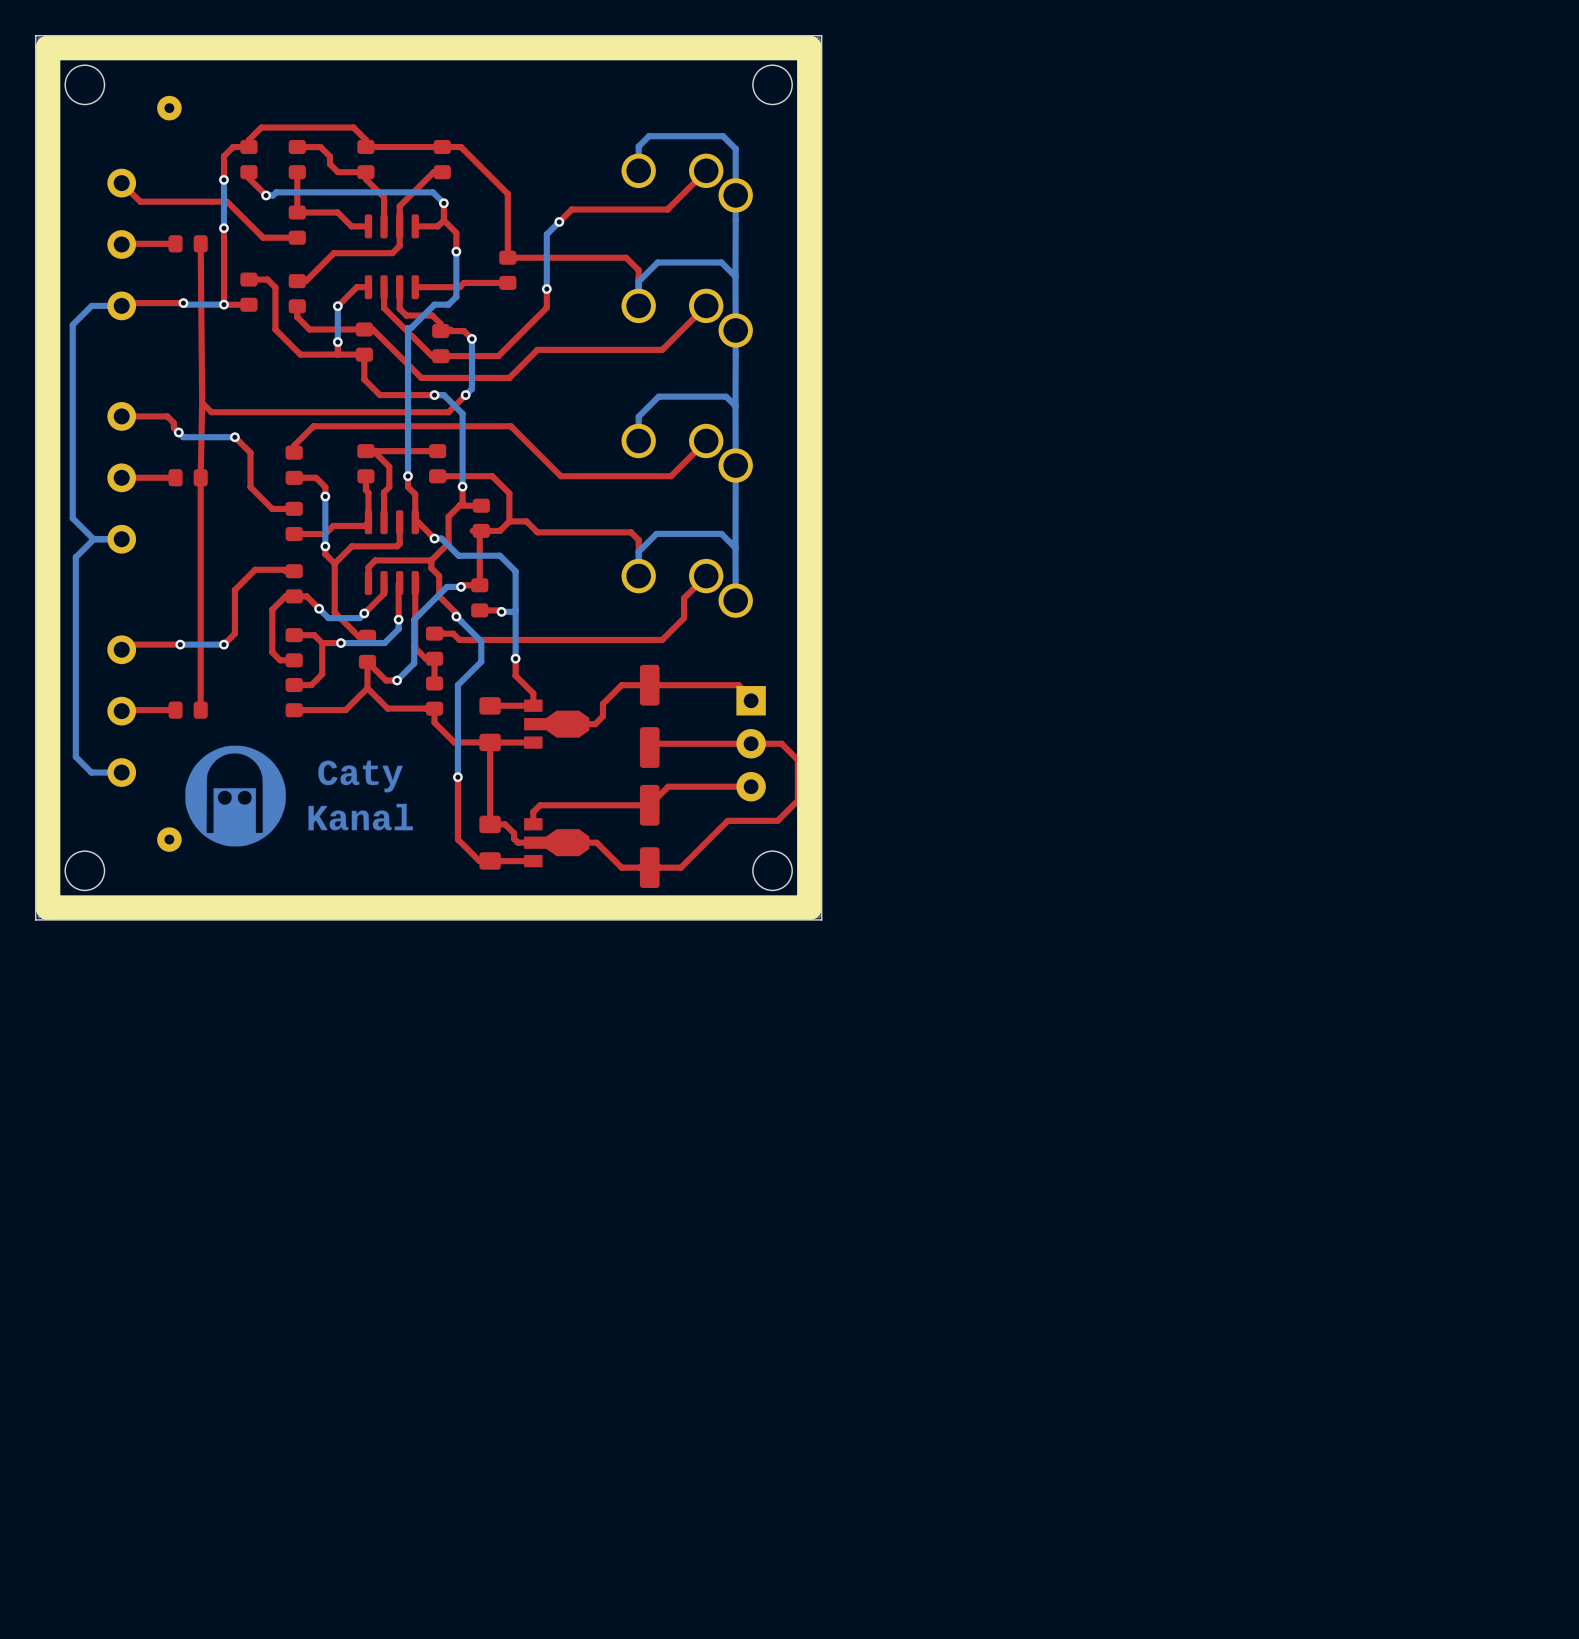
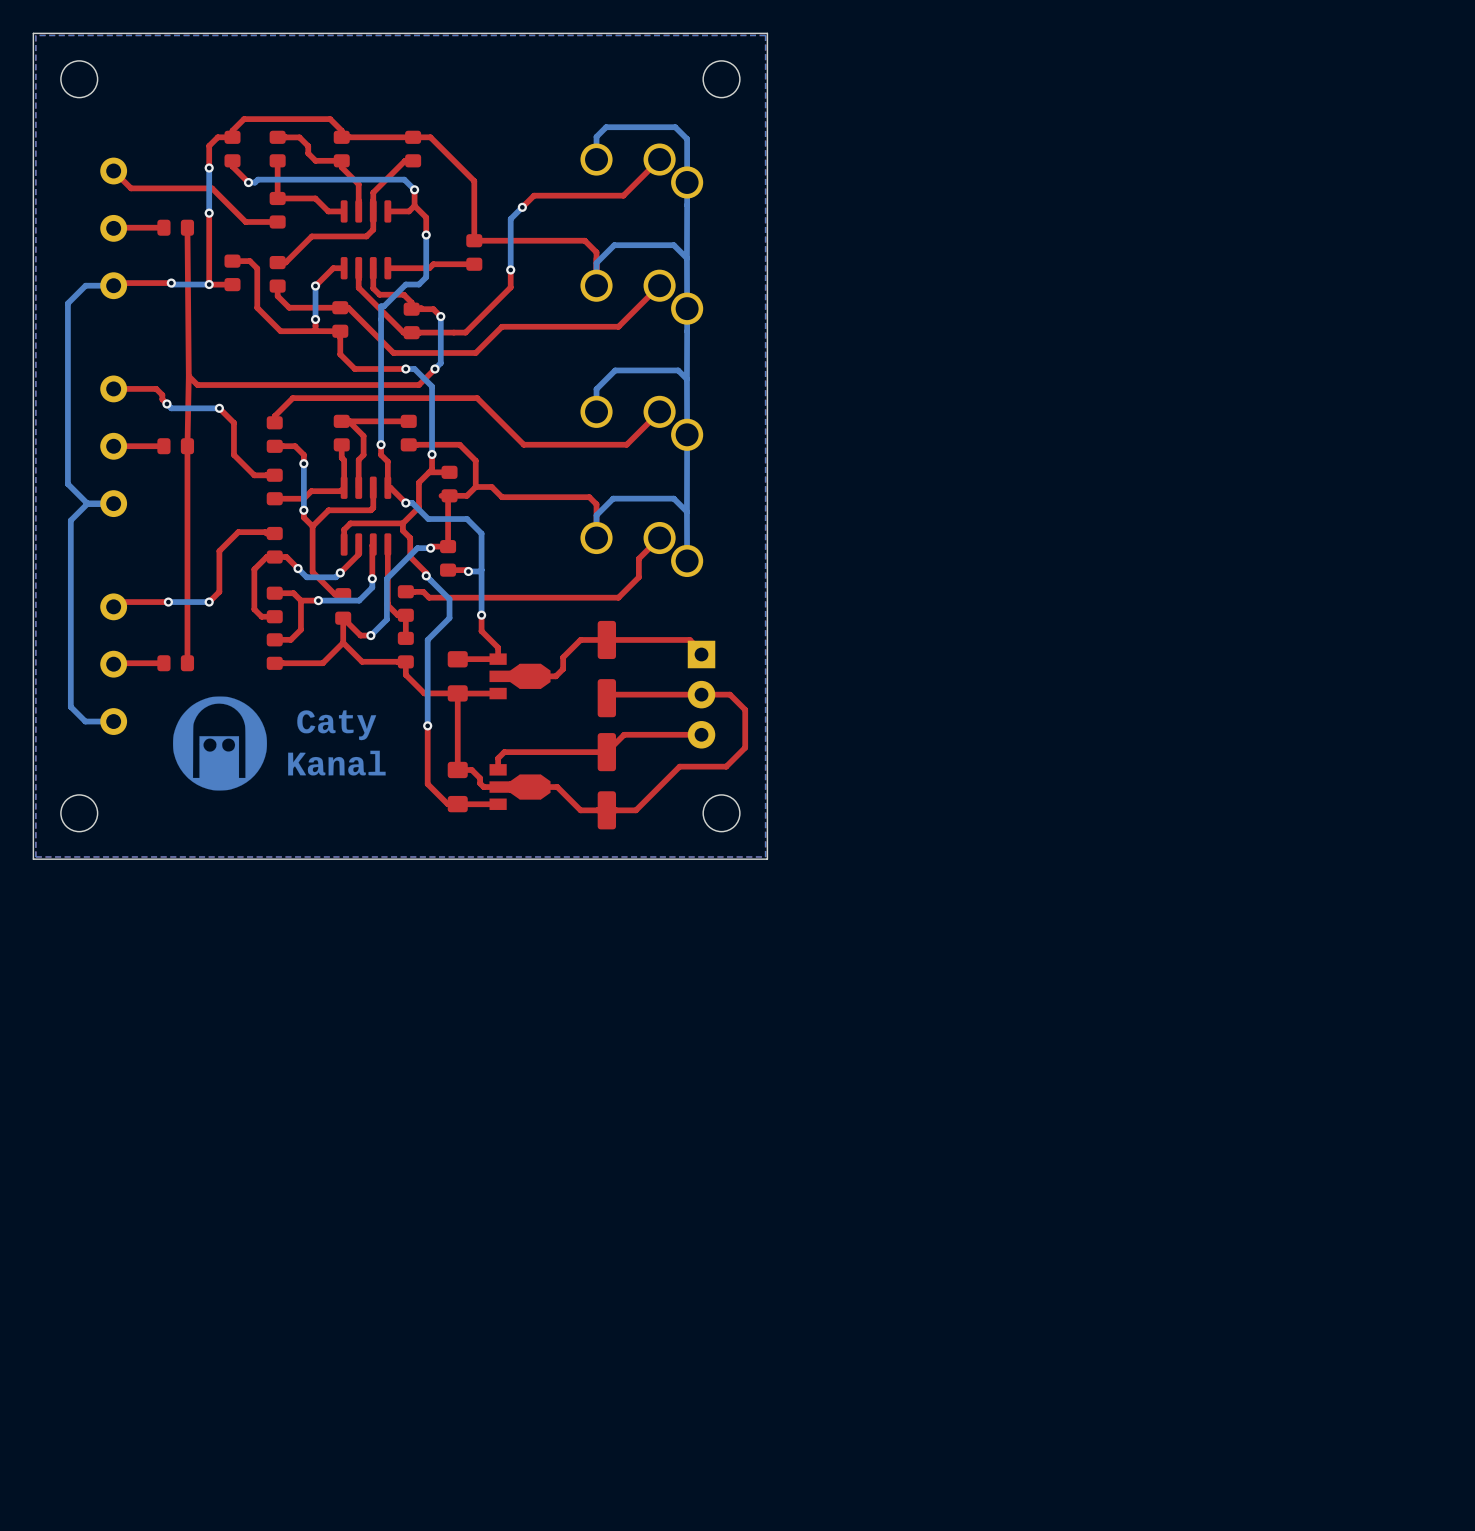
line: (809, 48) (48, 48) (48, 907) (809, 907) (809, 48) -> none
part: (169, 108) -> none
part: (169, 839) -> none

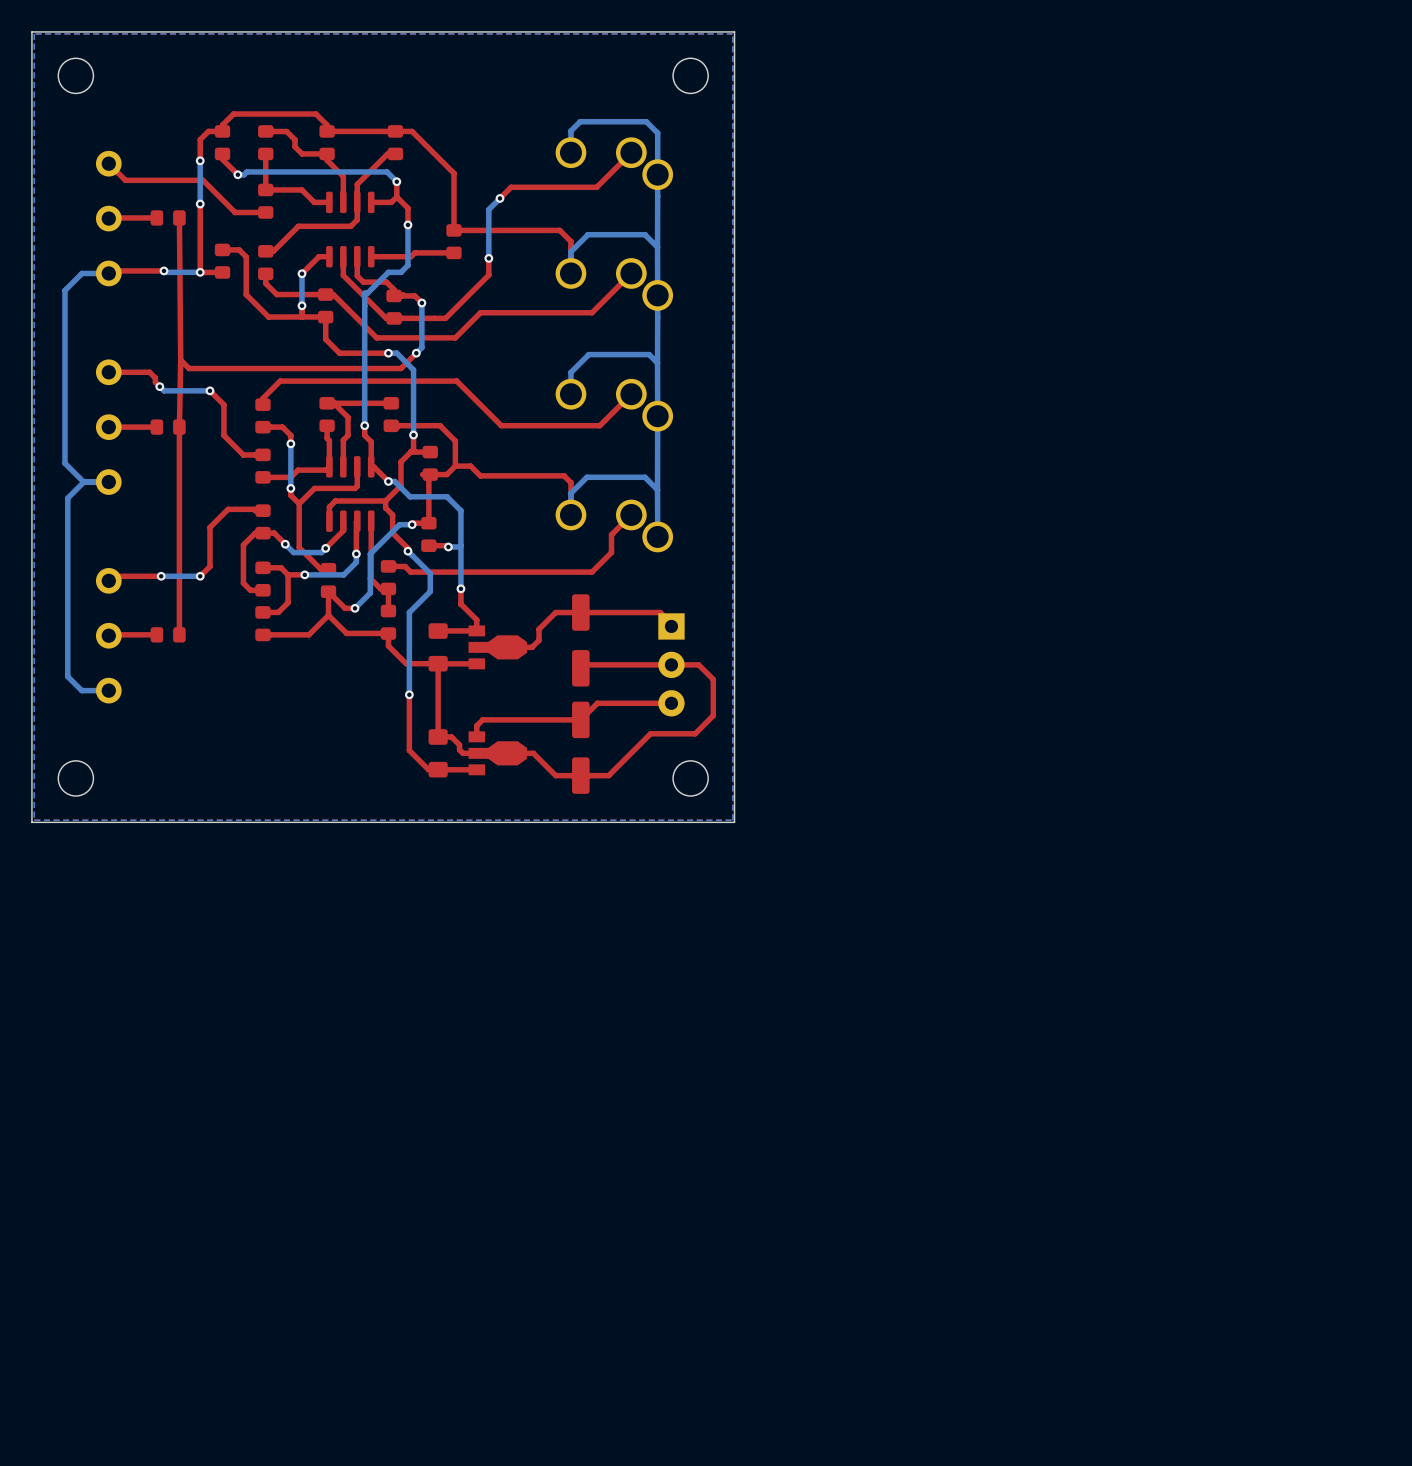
drawing: [173, 696, 386, 791] -> none

